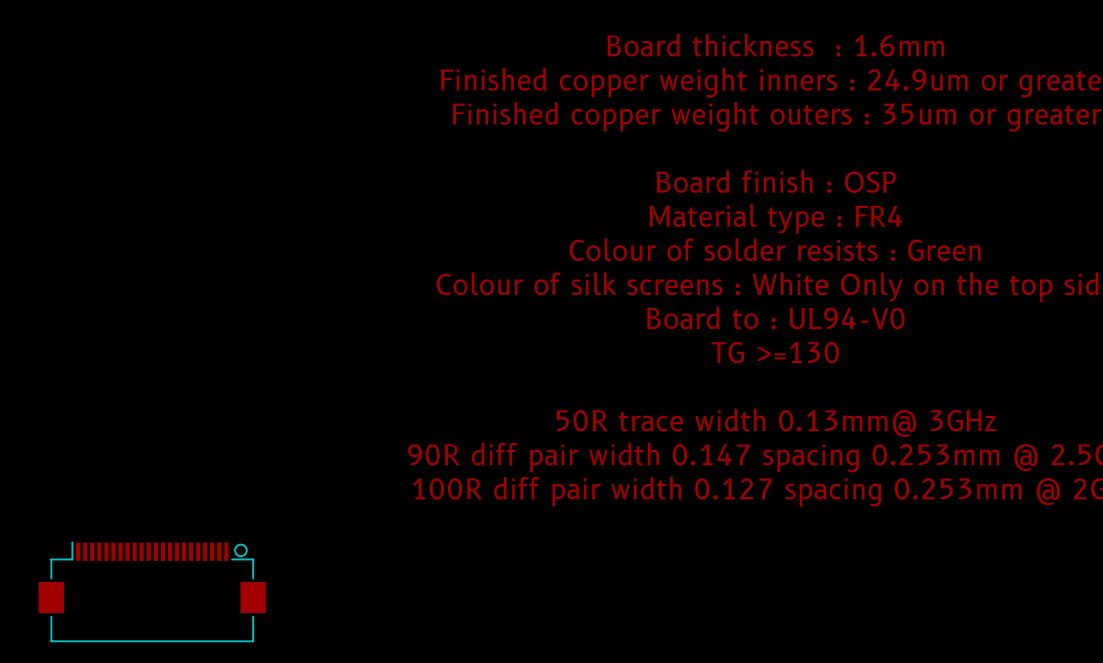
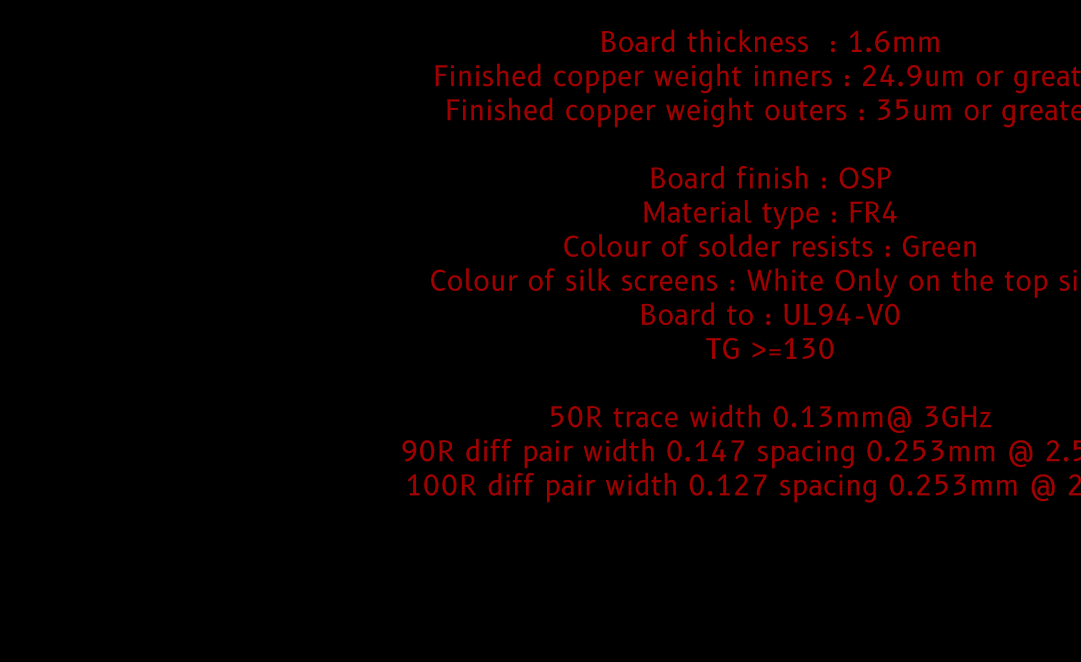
part: (152, 591) -> none

